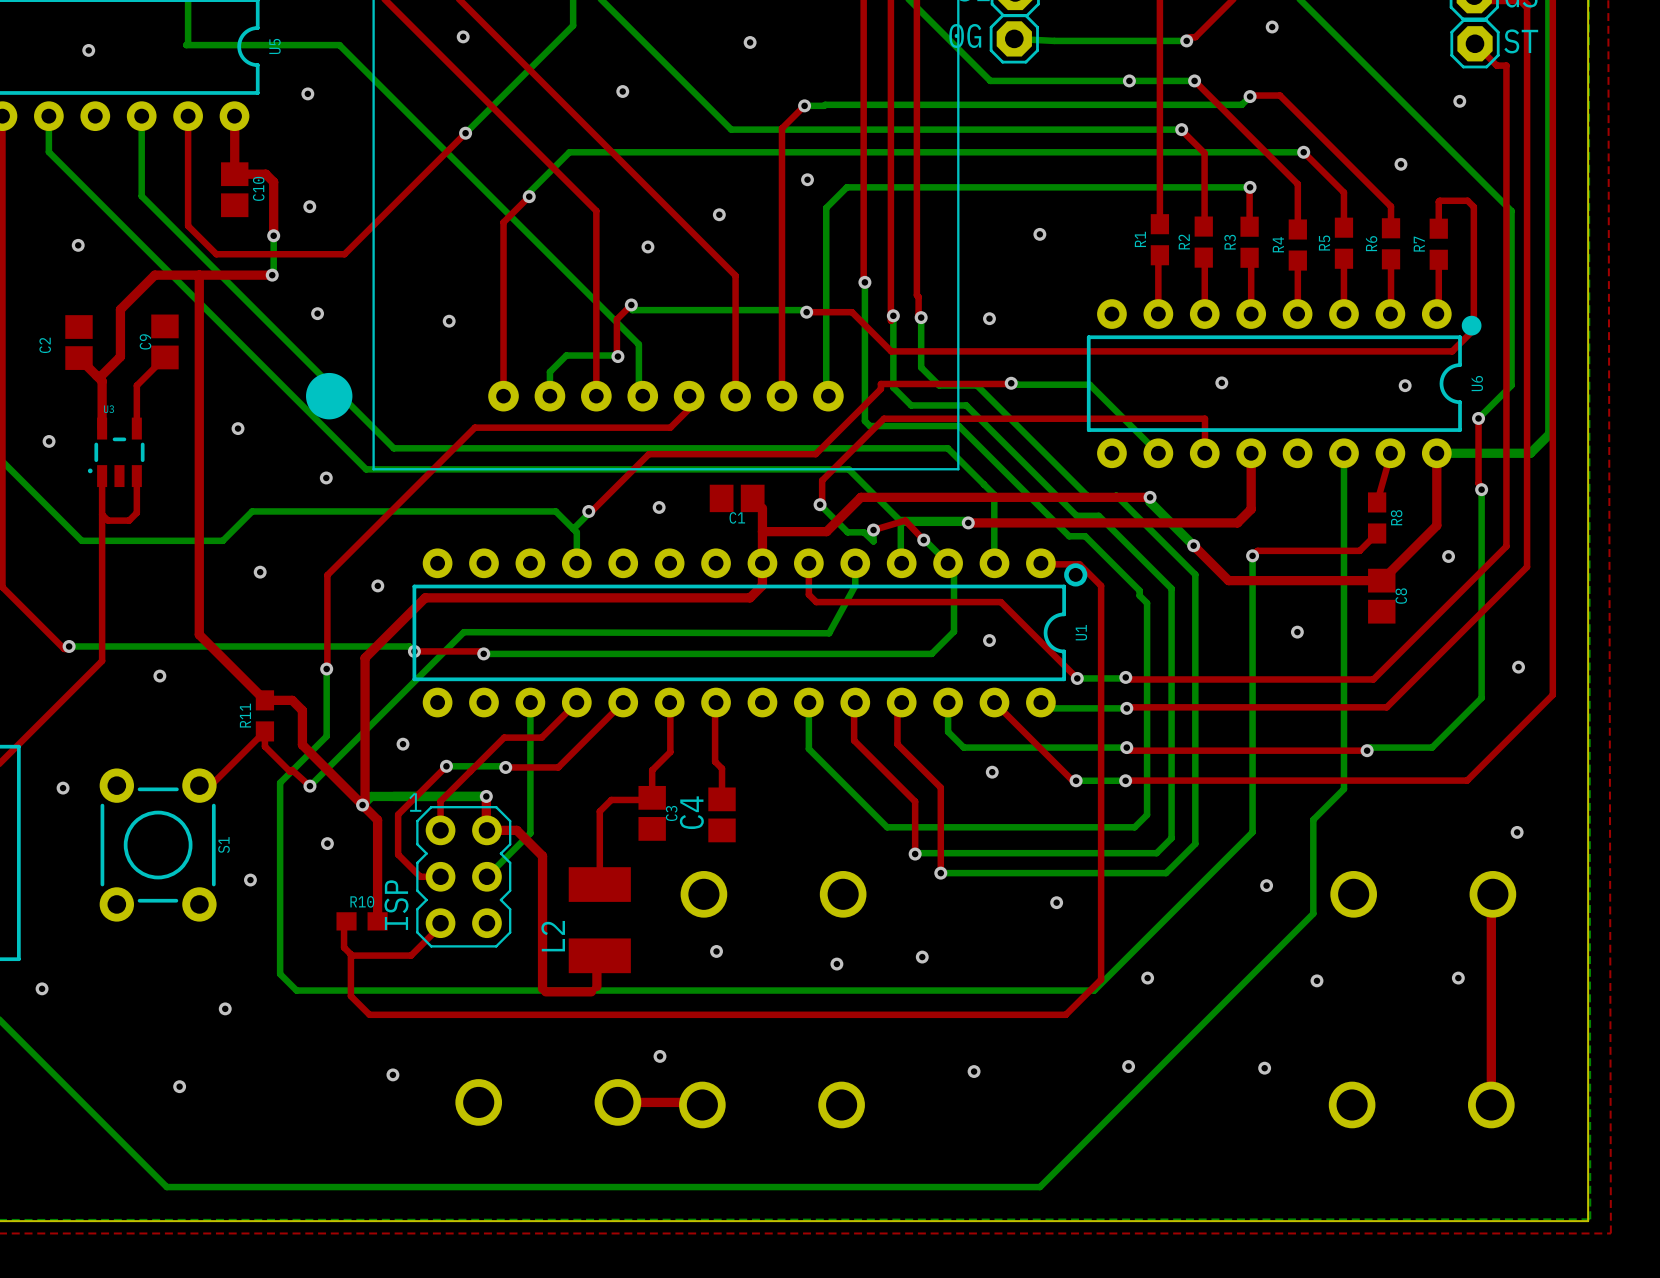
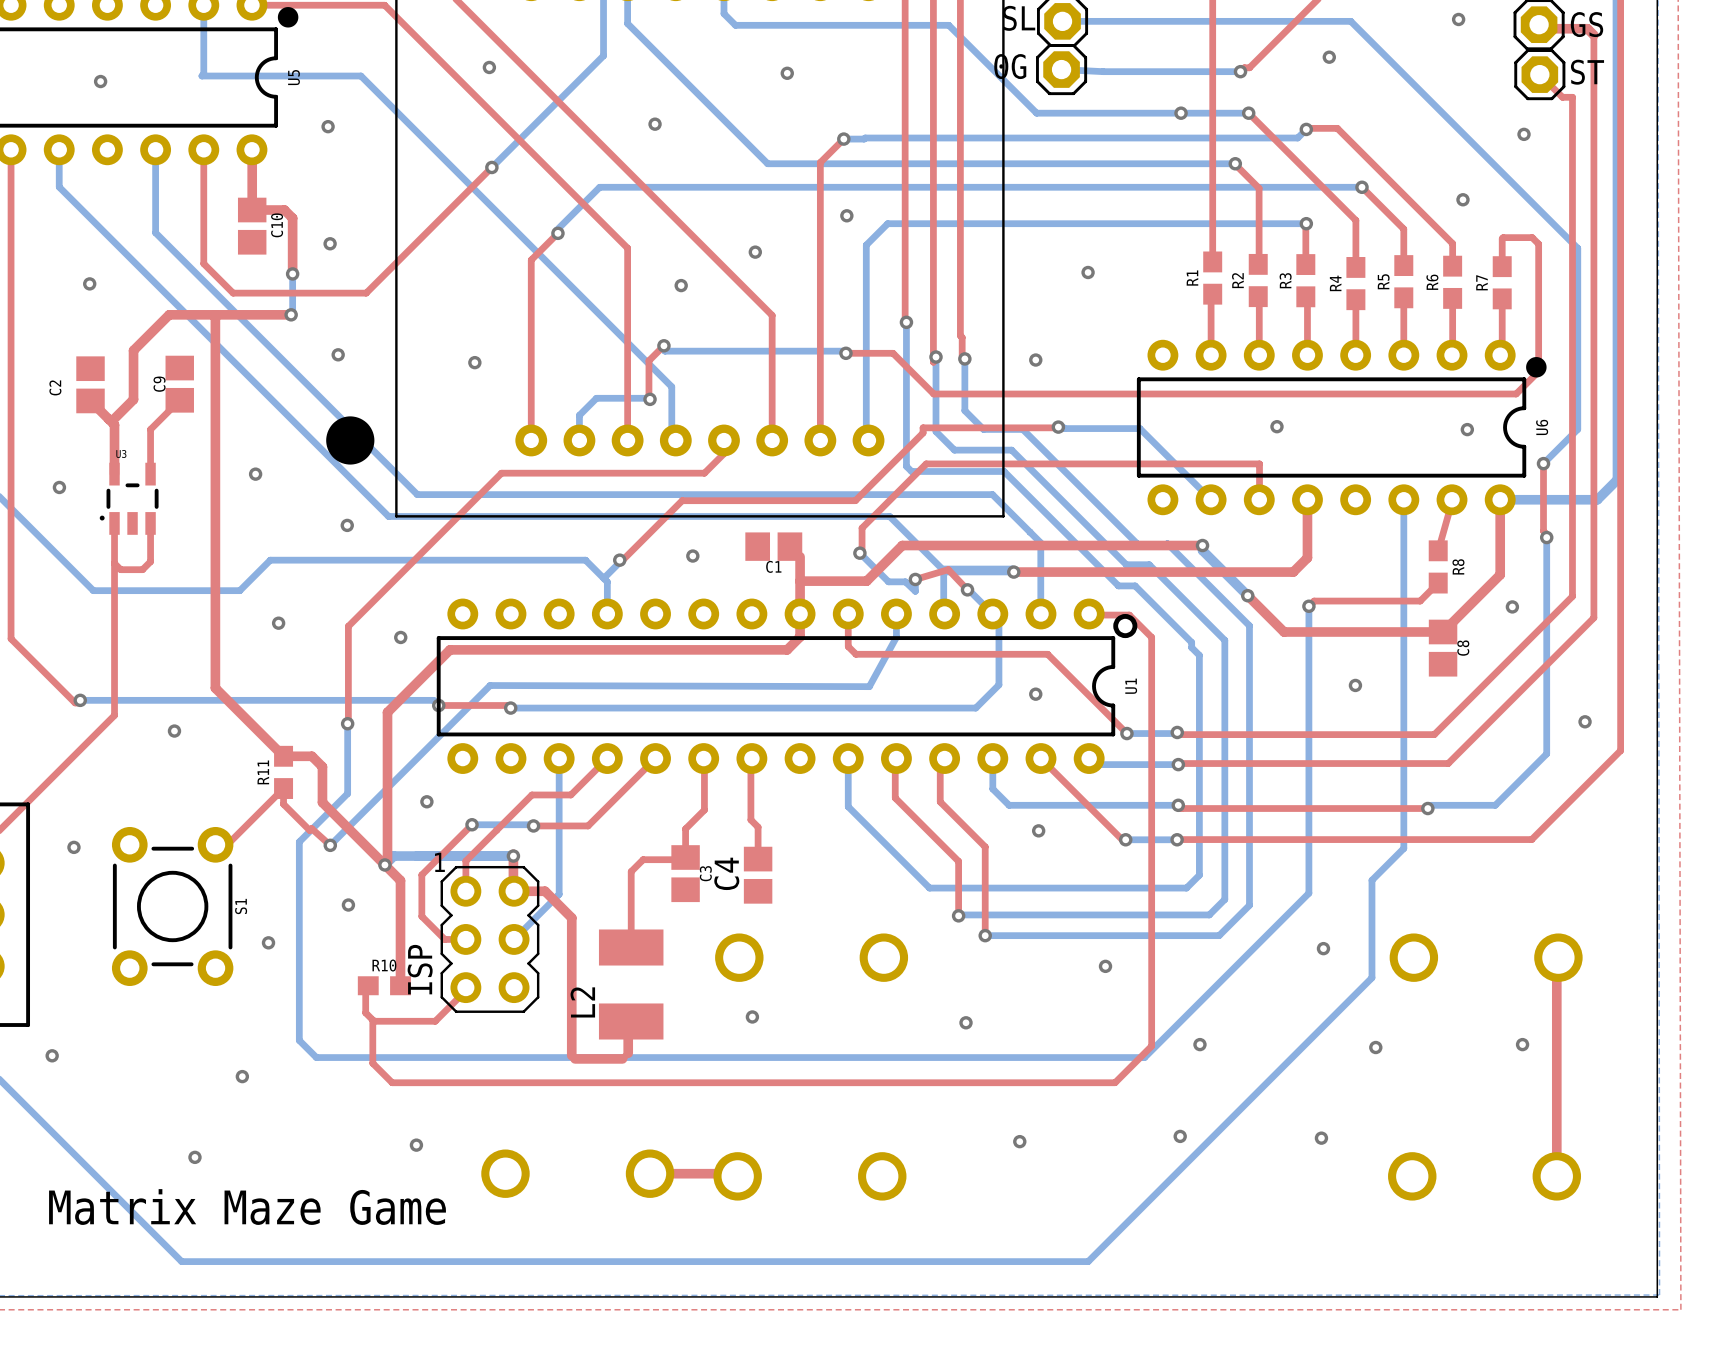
via: (1517, 832) -> none
via: (836, 964) -> none
via: (659, 1056) -> none
text: none -> Matrix Maze Game (247, 1207)

